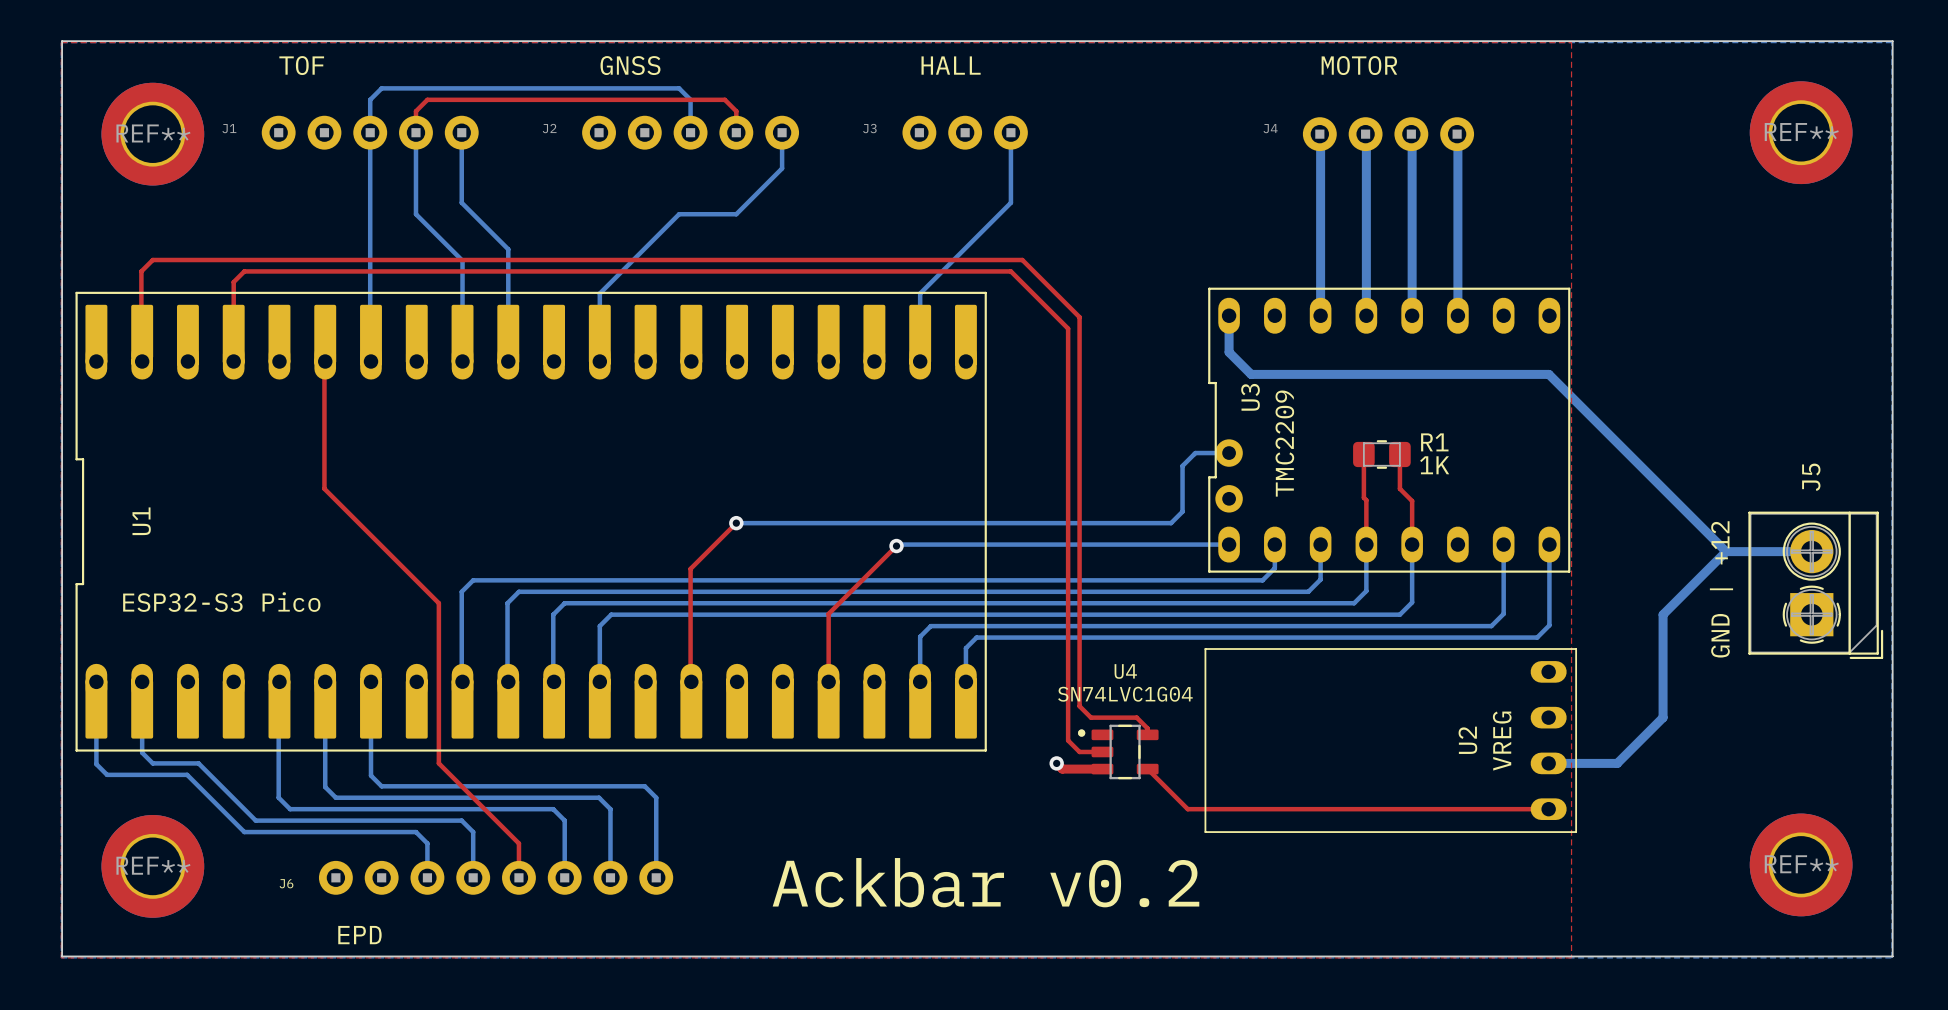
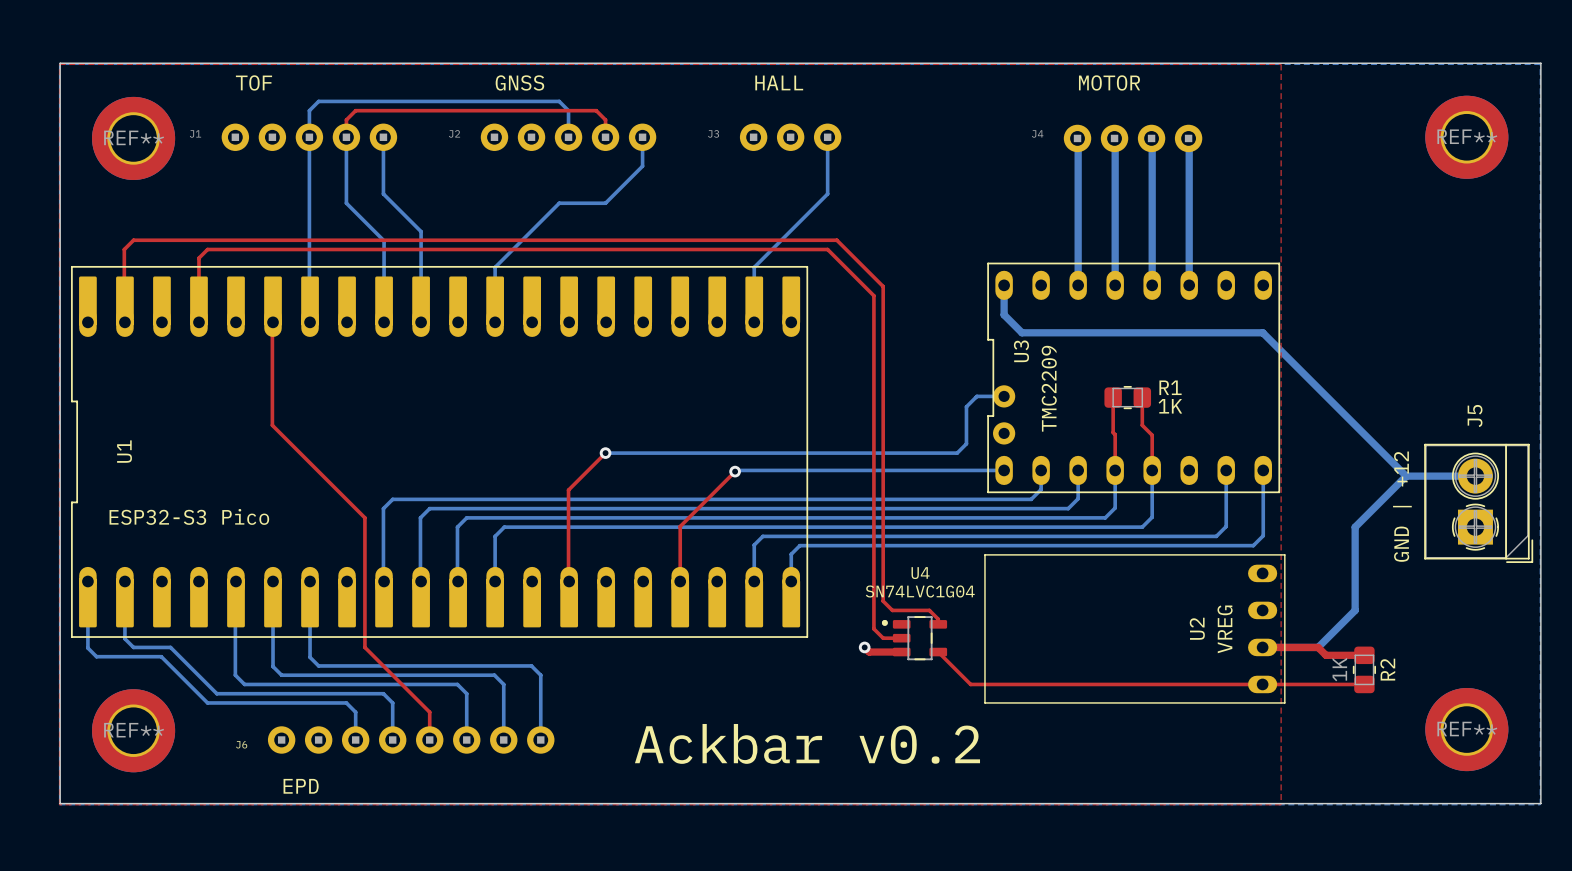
top track: none -> (1262, 647) (1318, 647) (1326, 655) (1364, 655)
R2: none -> 1K (1364, 669)
top track: none -> (1262, 684) (1364, 684)

